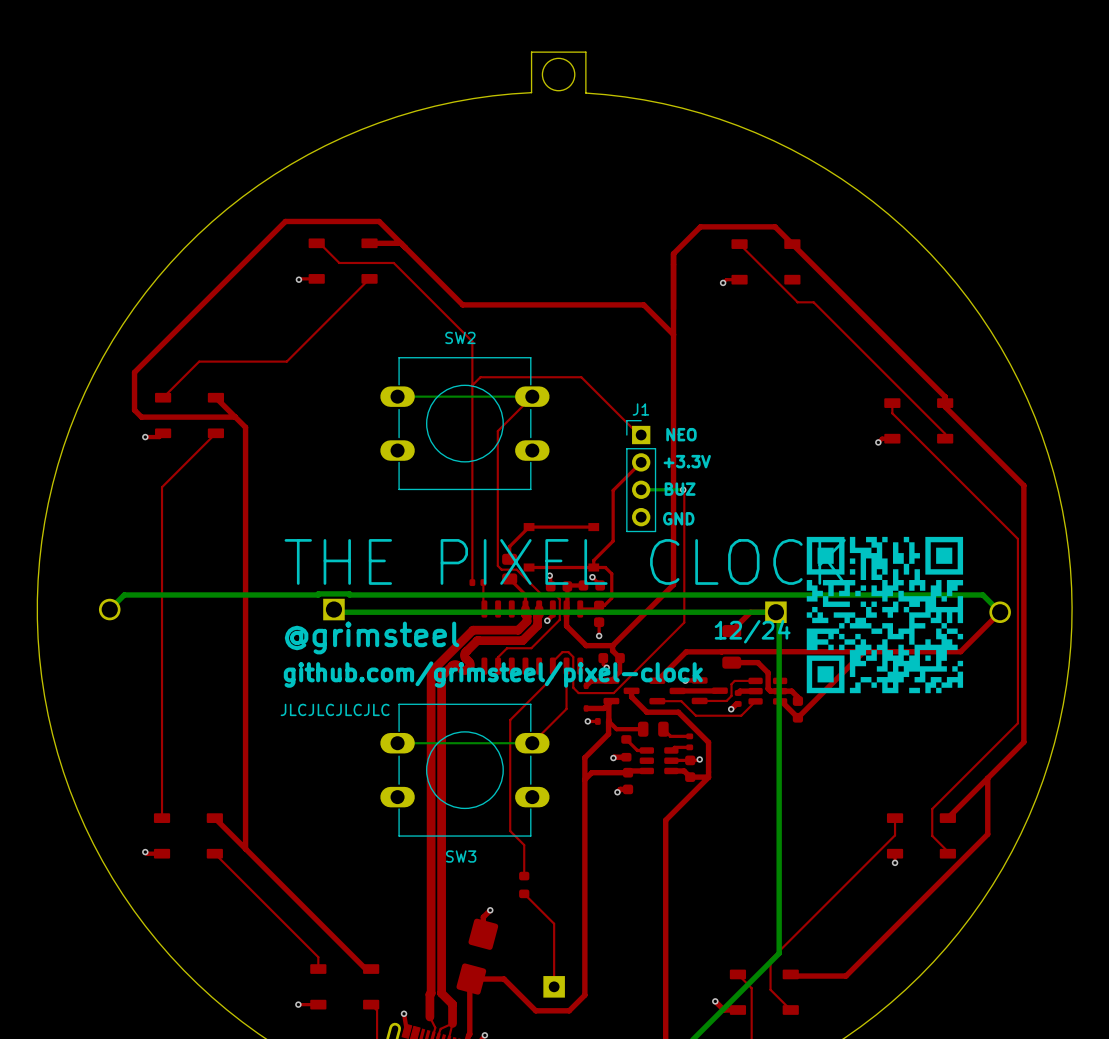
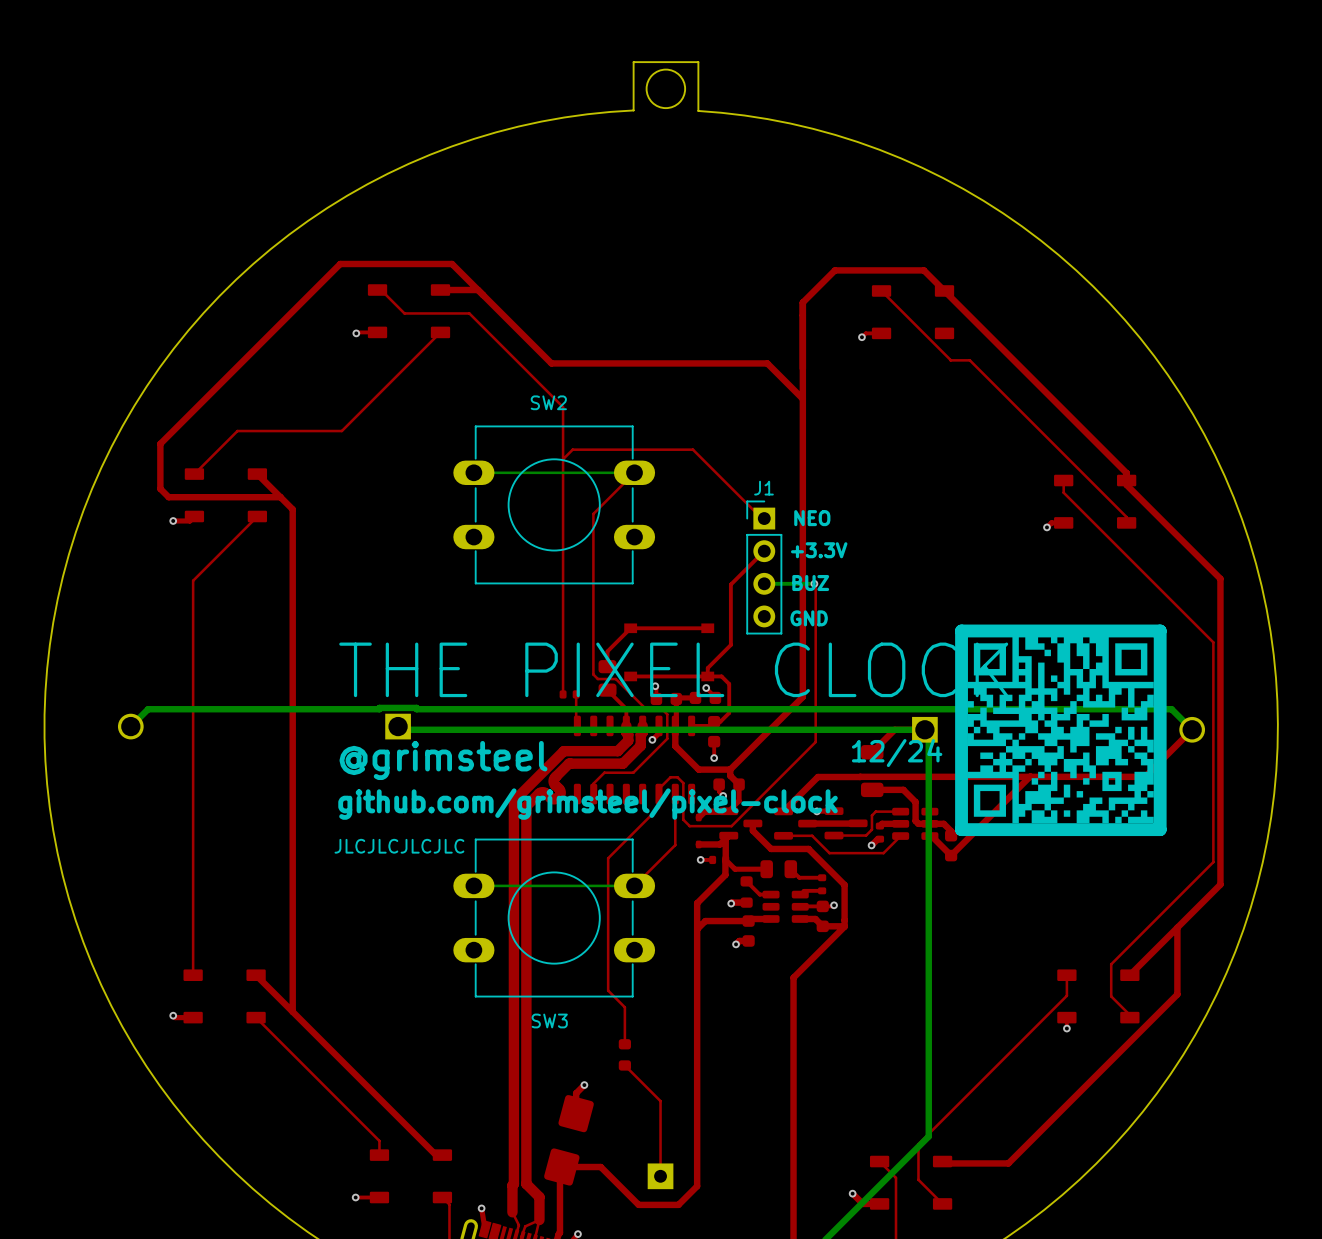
line: none -> (1160, 630) (961, 630) (961, 829) (1160, 829) (1160, 630)
drawing shape: [806, 536, 964, 694] -> [967, 636, 1154, 824]

